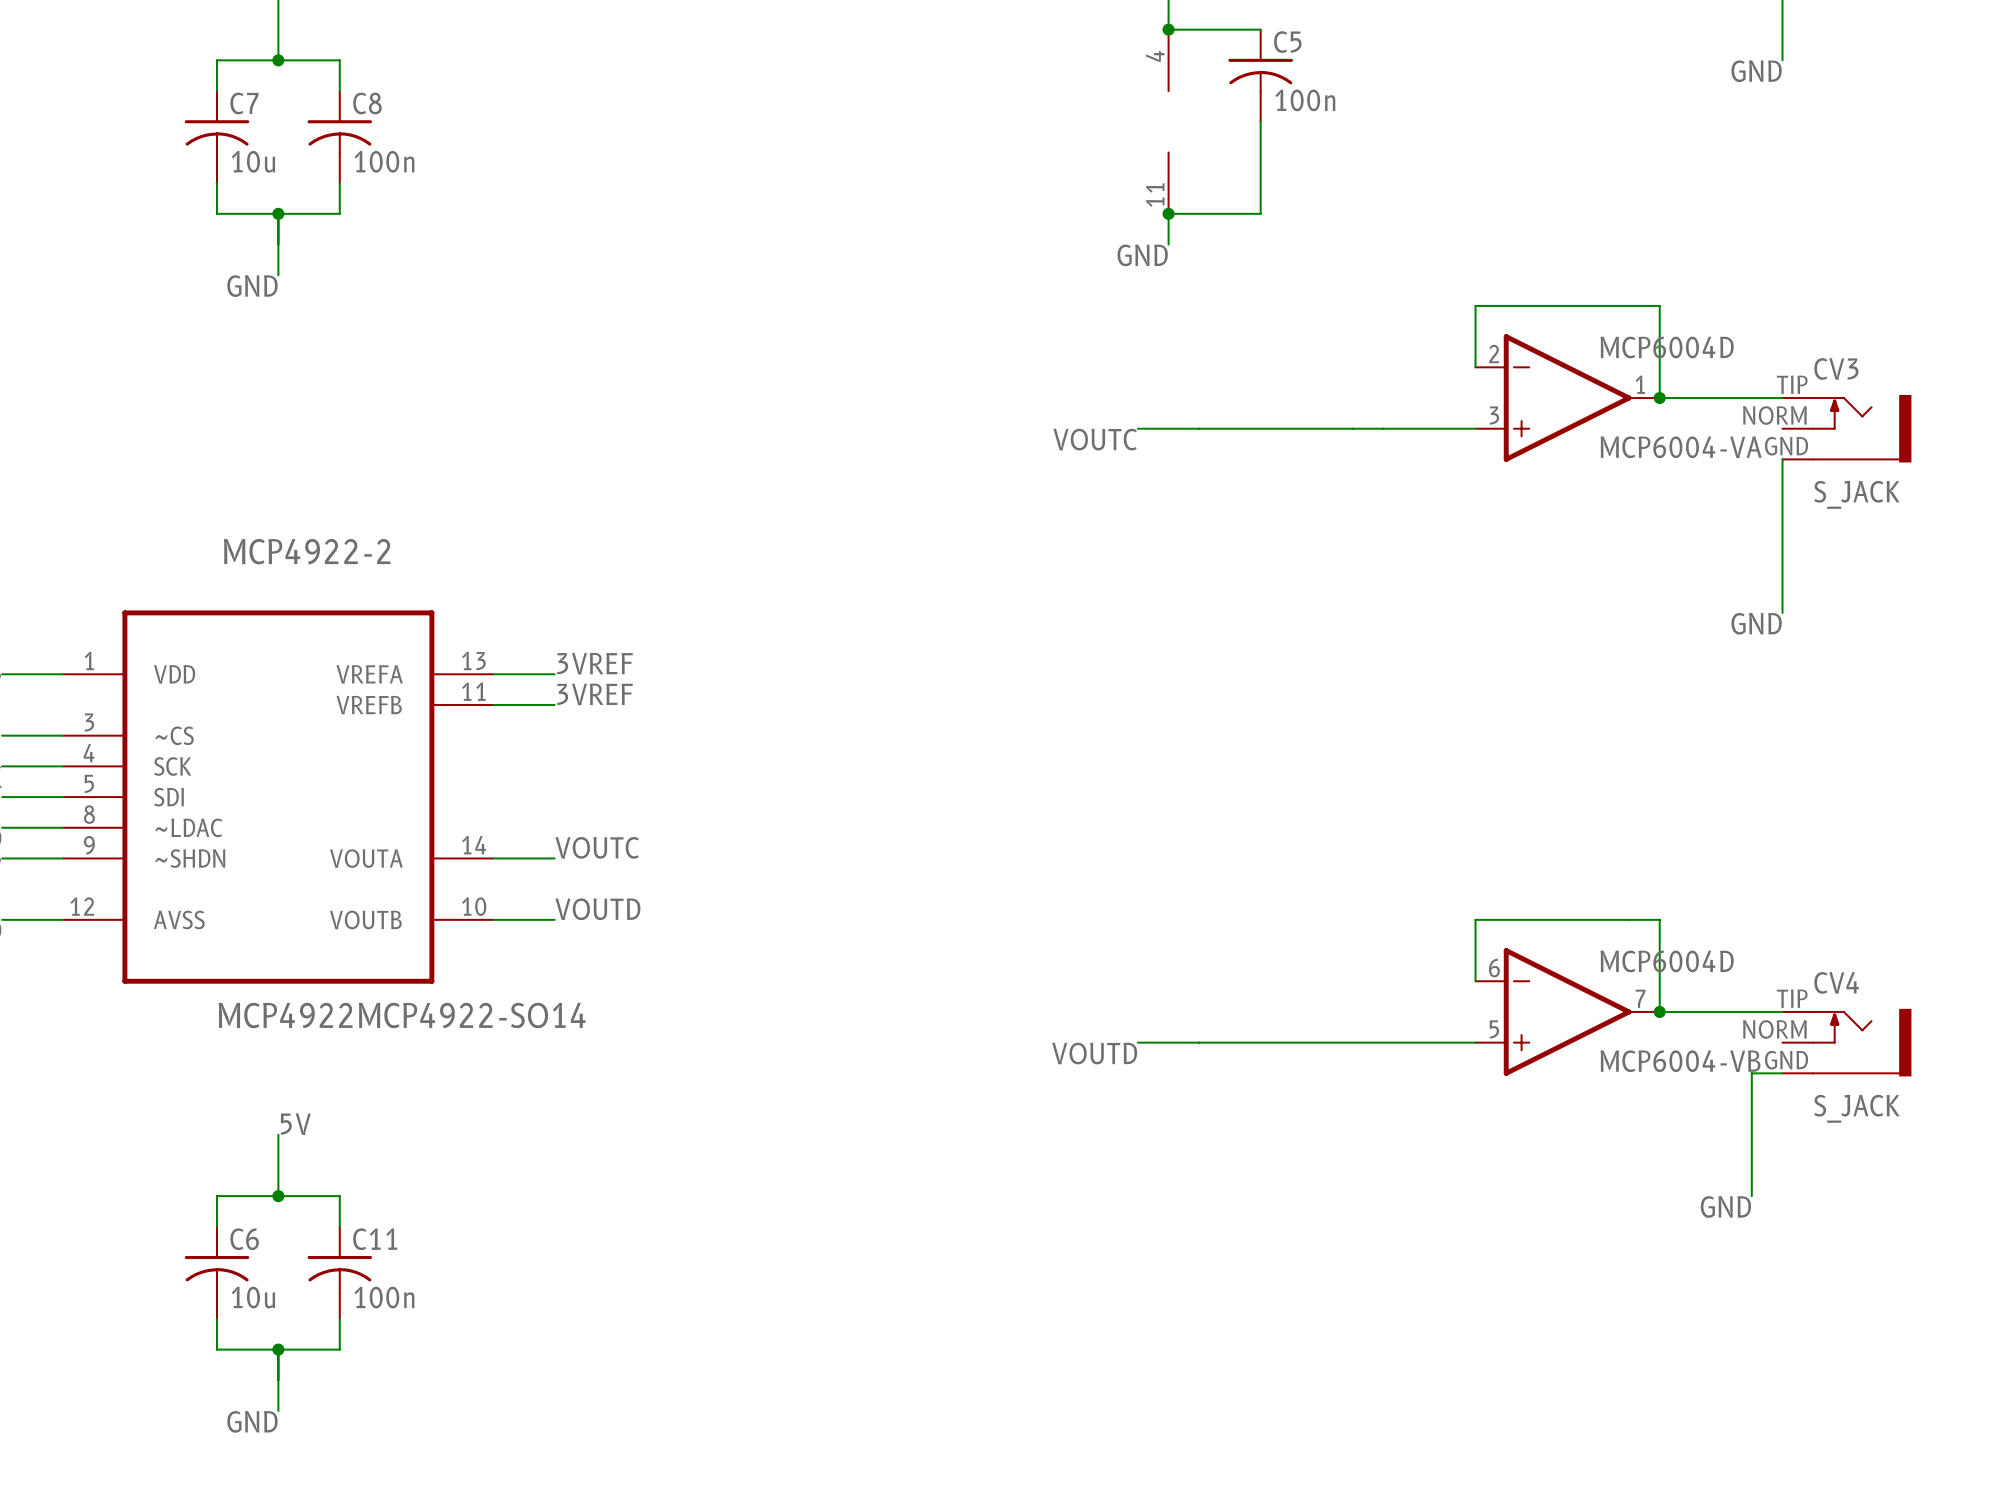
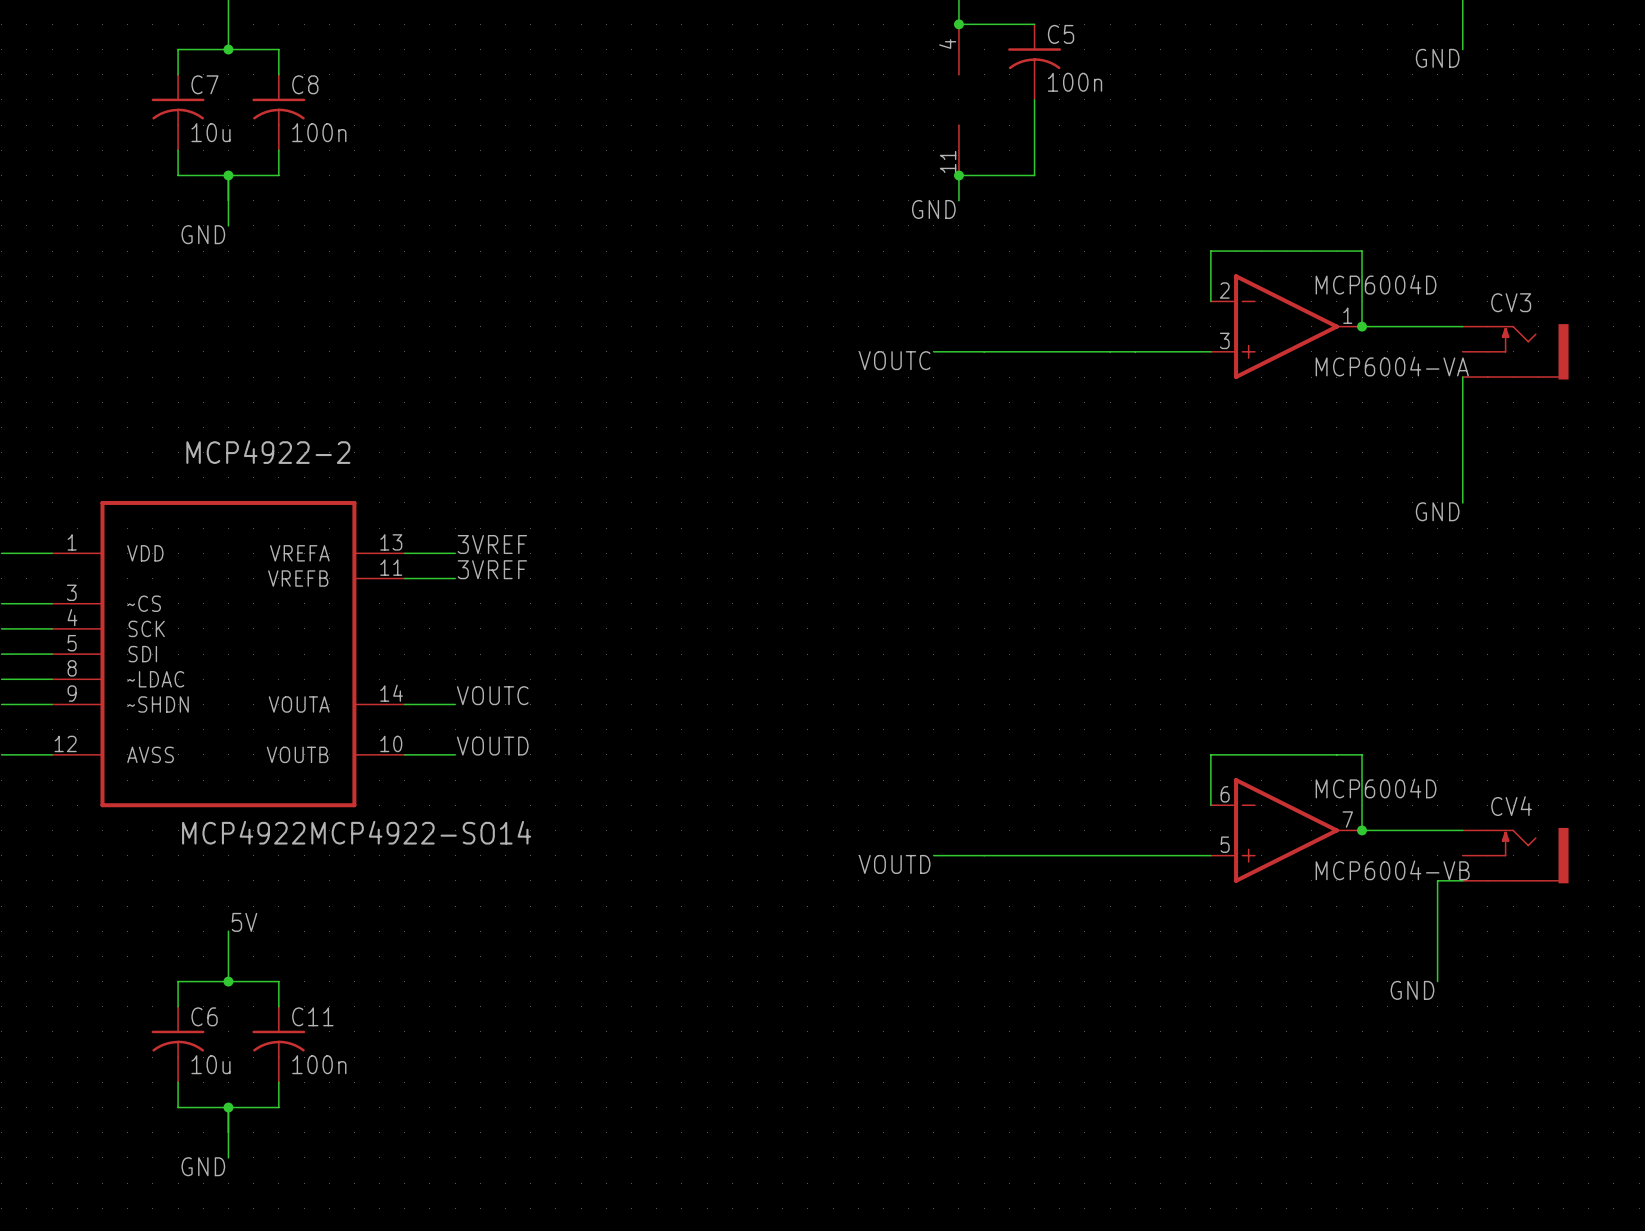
CV3 pin number: TIP (1792, 384) -> none
CV3 pin number: NORM (1774, 415) -> none
CV3 pin number: GND (1786, 446) -> none
CV3 value: S_JACK (1856, 494) -> none
CV4 pin number: TIP (1792, 998) -> none
CV4 pin number: NORM (1774, 1029) -> none
CV4 pin number: GND (1786, 1060) -> none
CV4 value: S_JACK (1856, 1108) -> none

